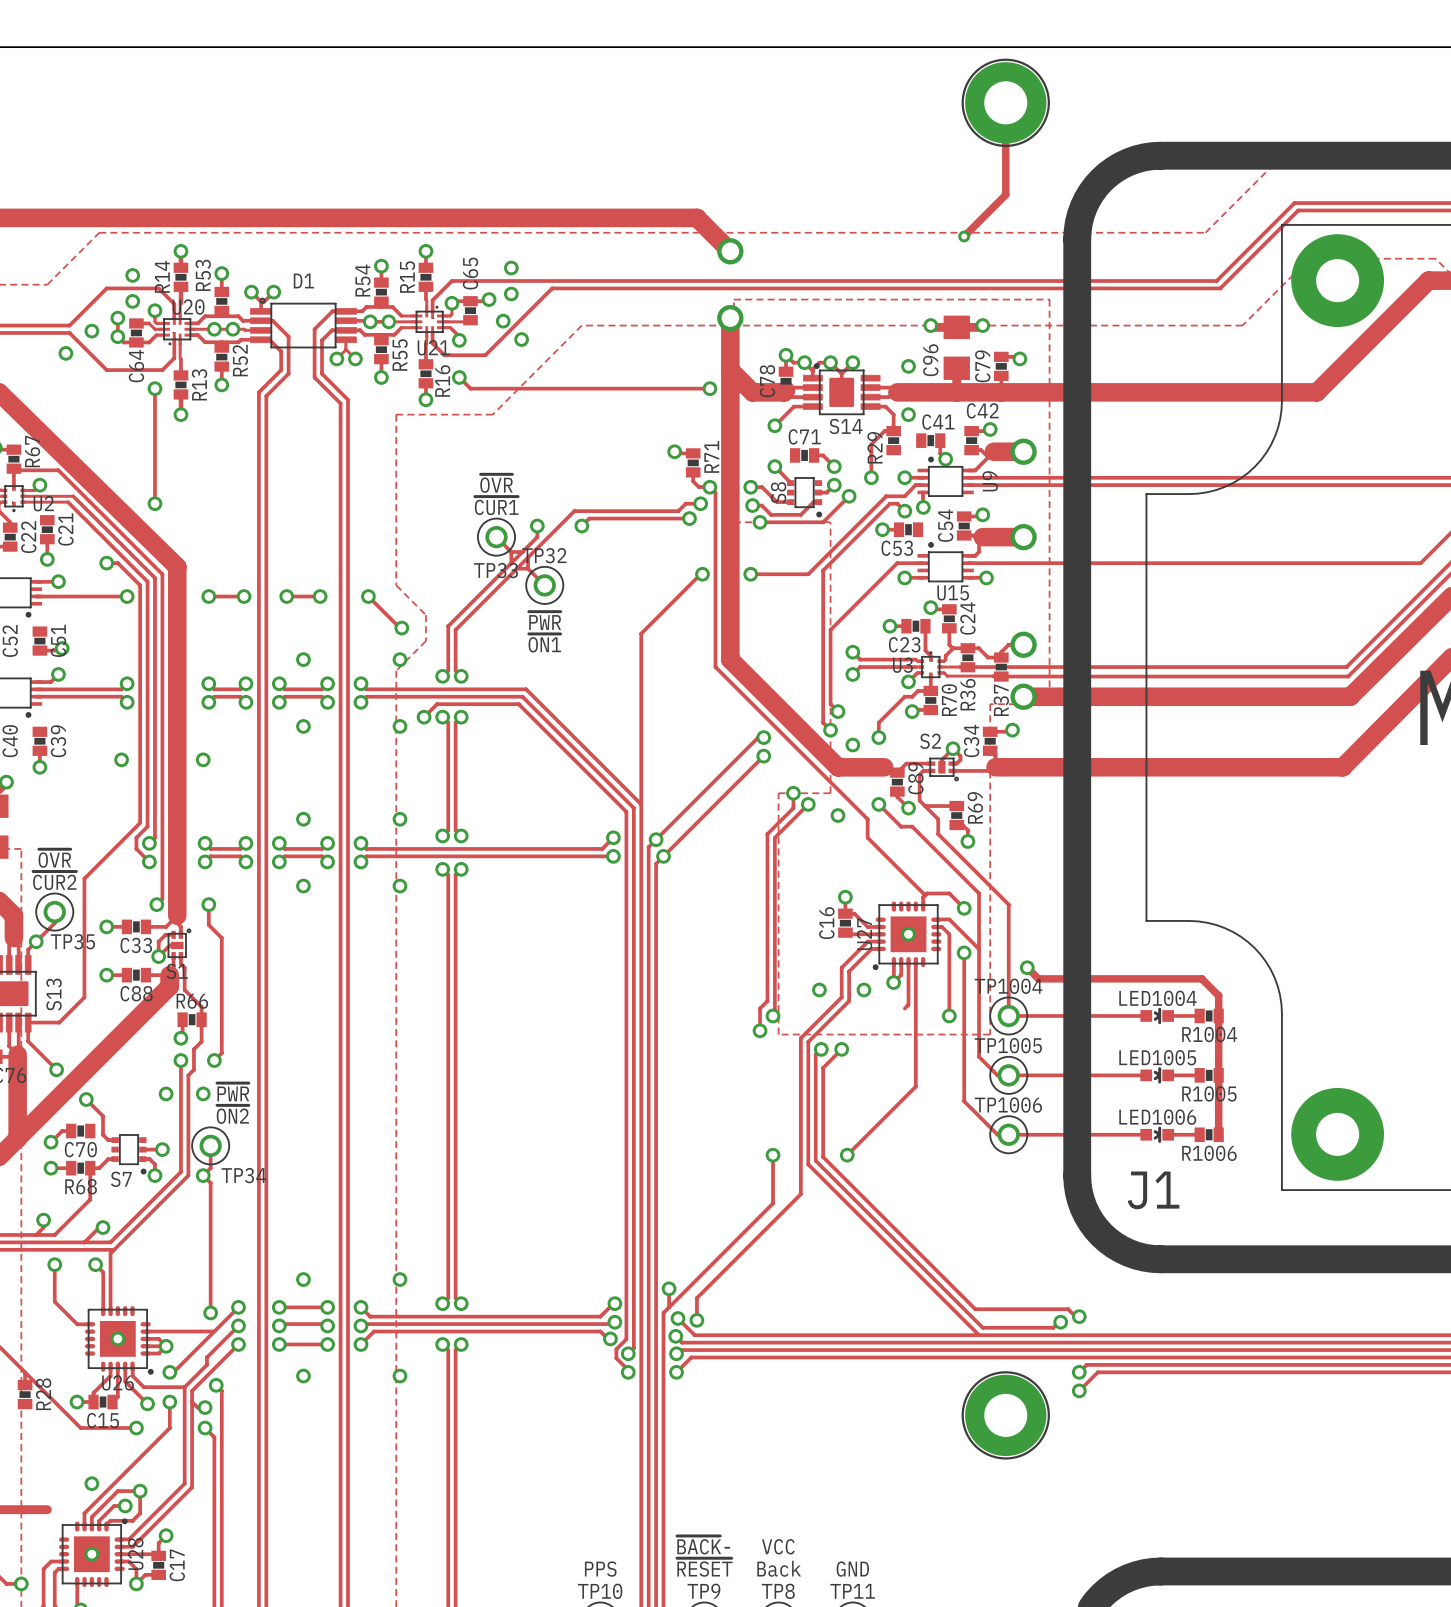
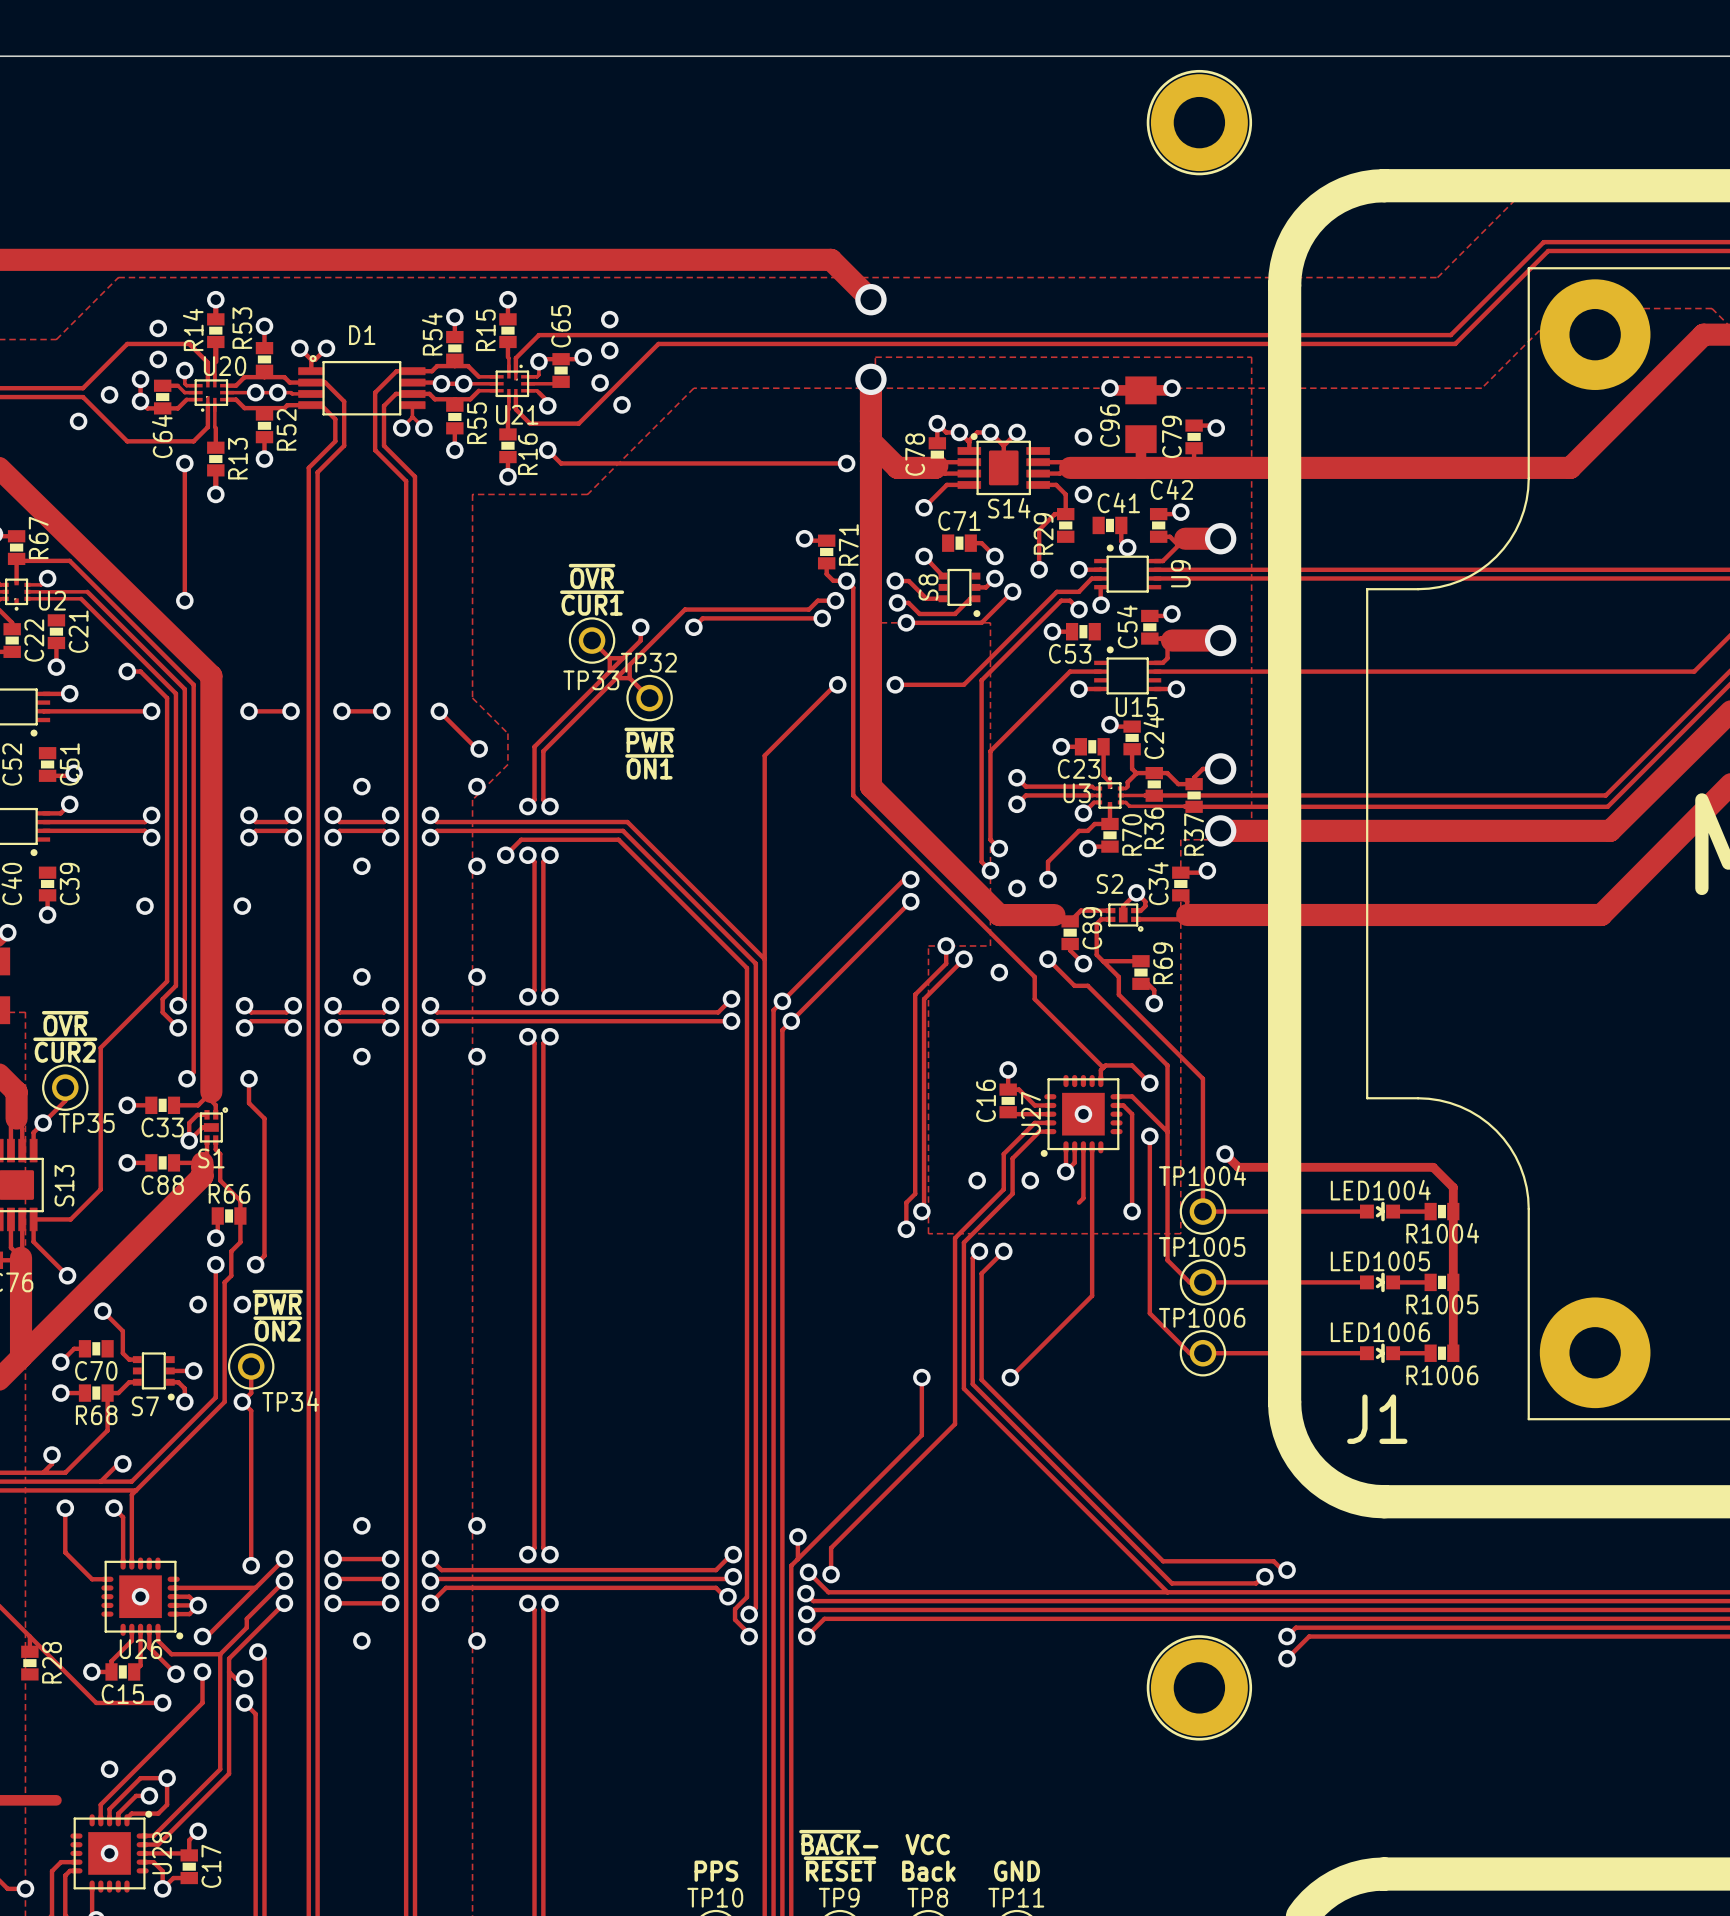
track: (1005, 102) (1005, 194) (964, 236) -> none
via: (964, 236) -> none

